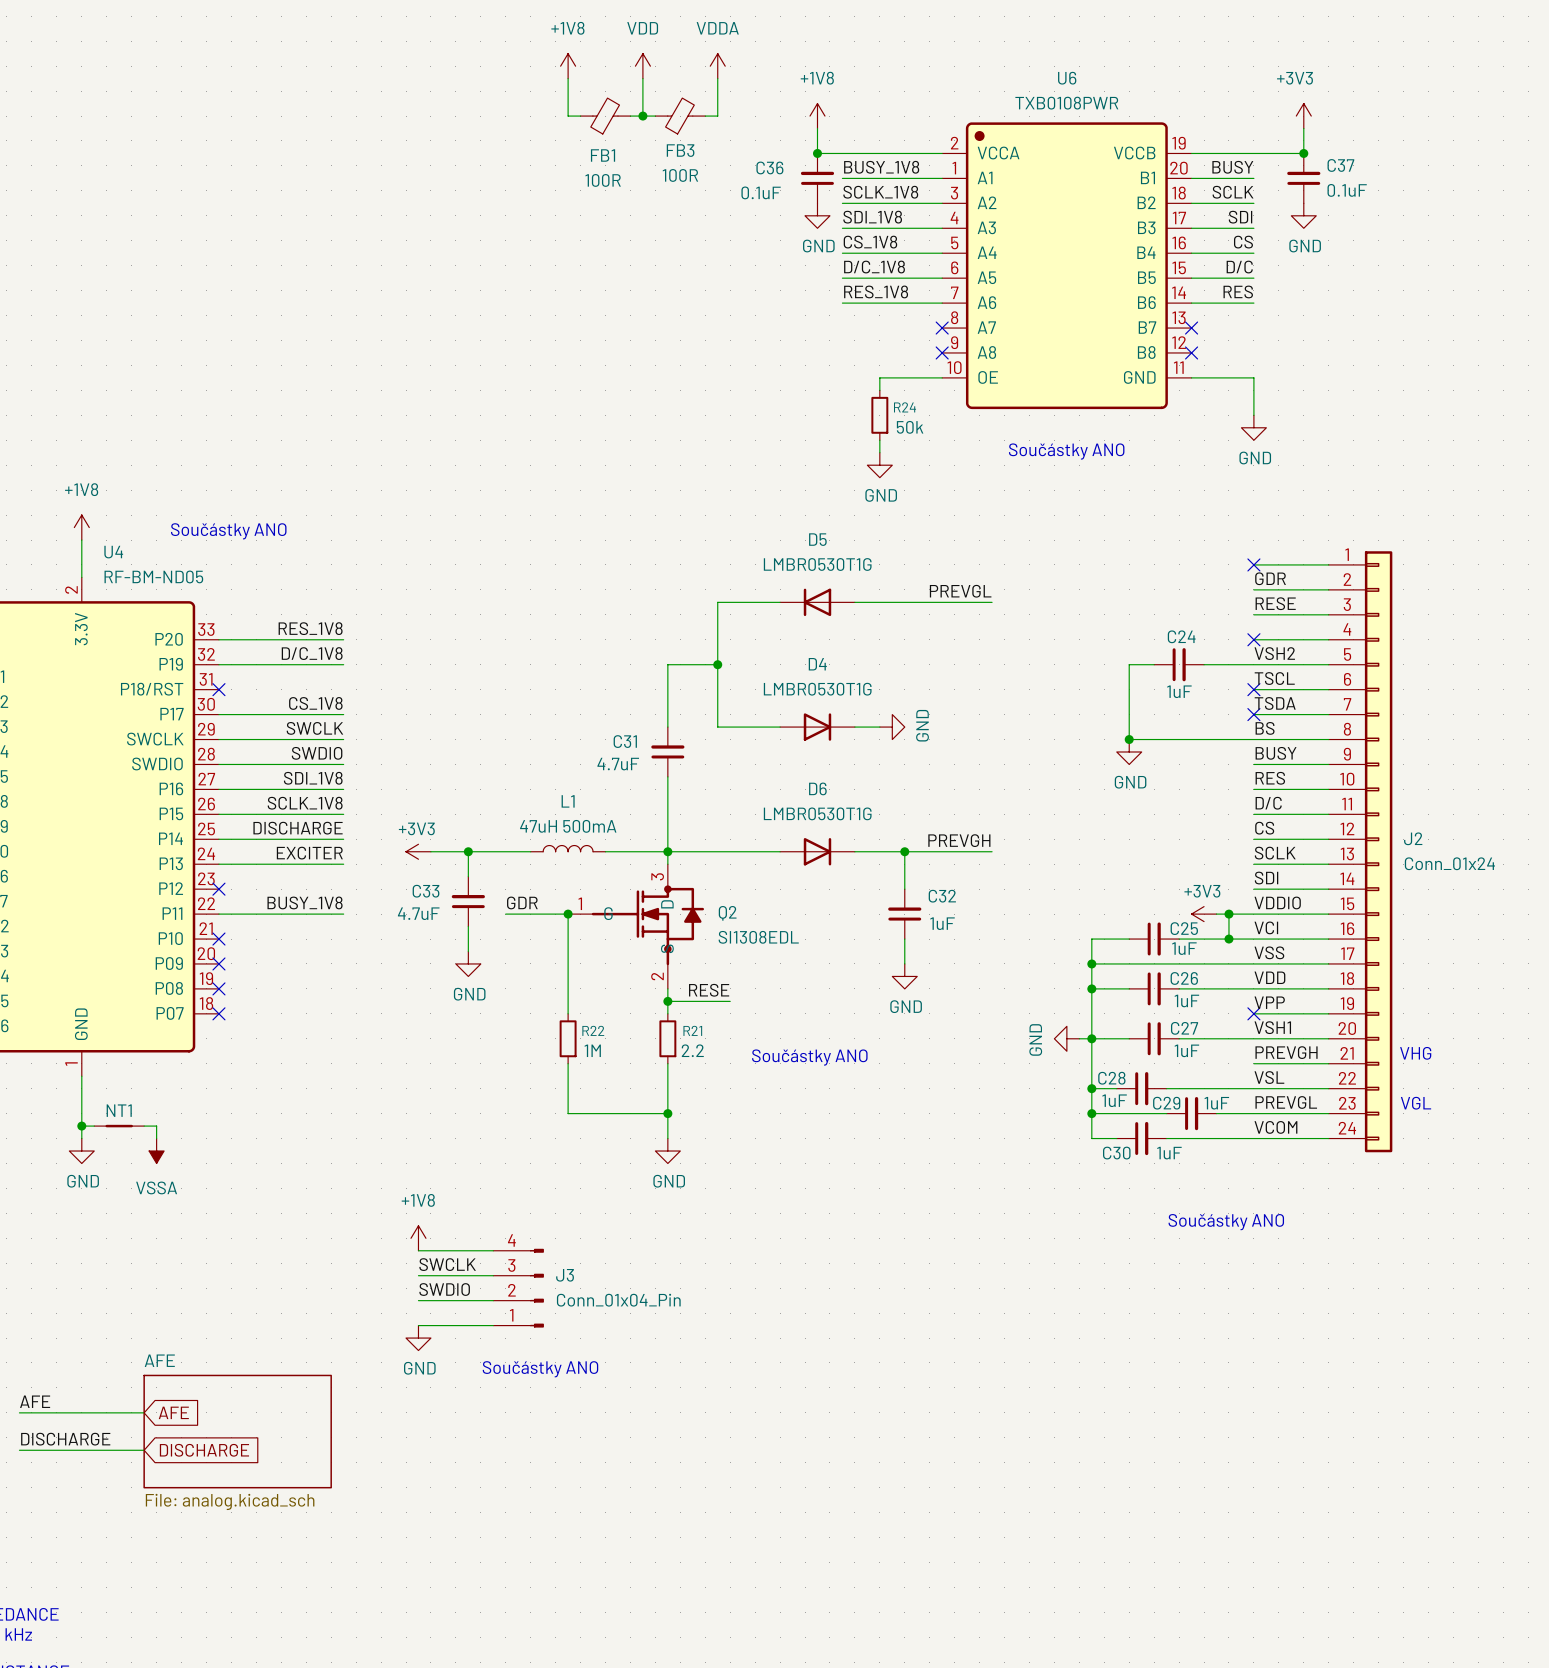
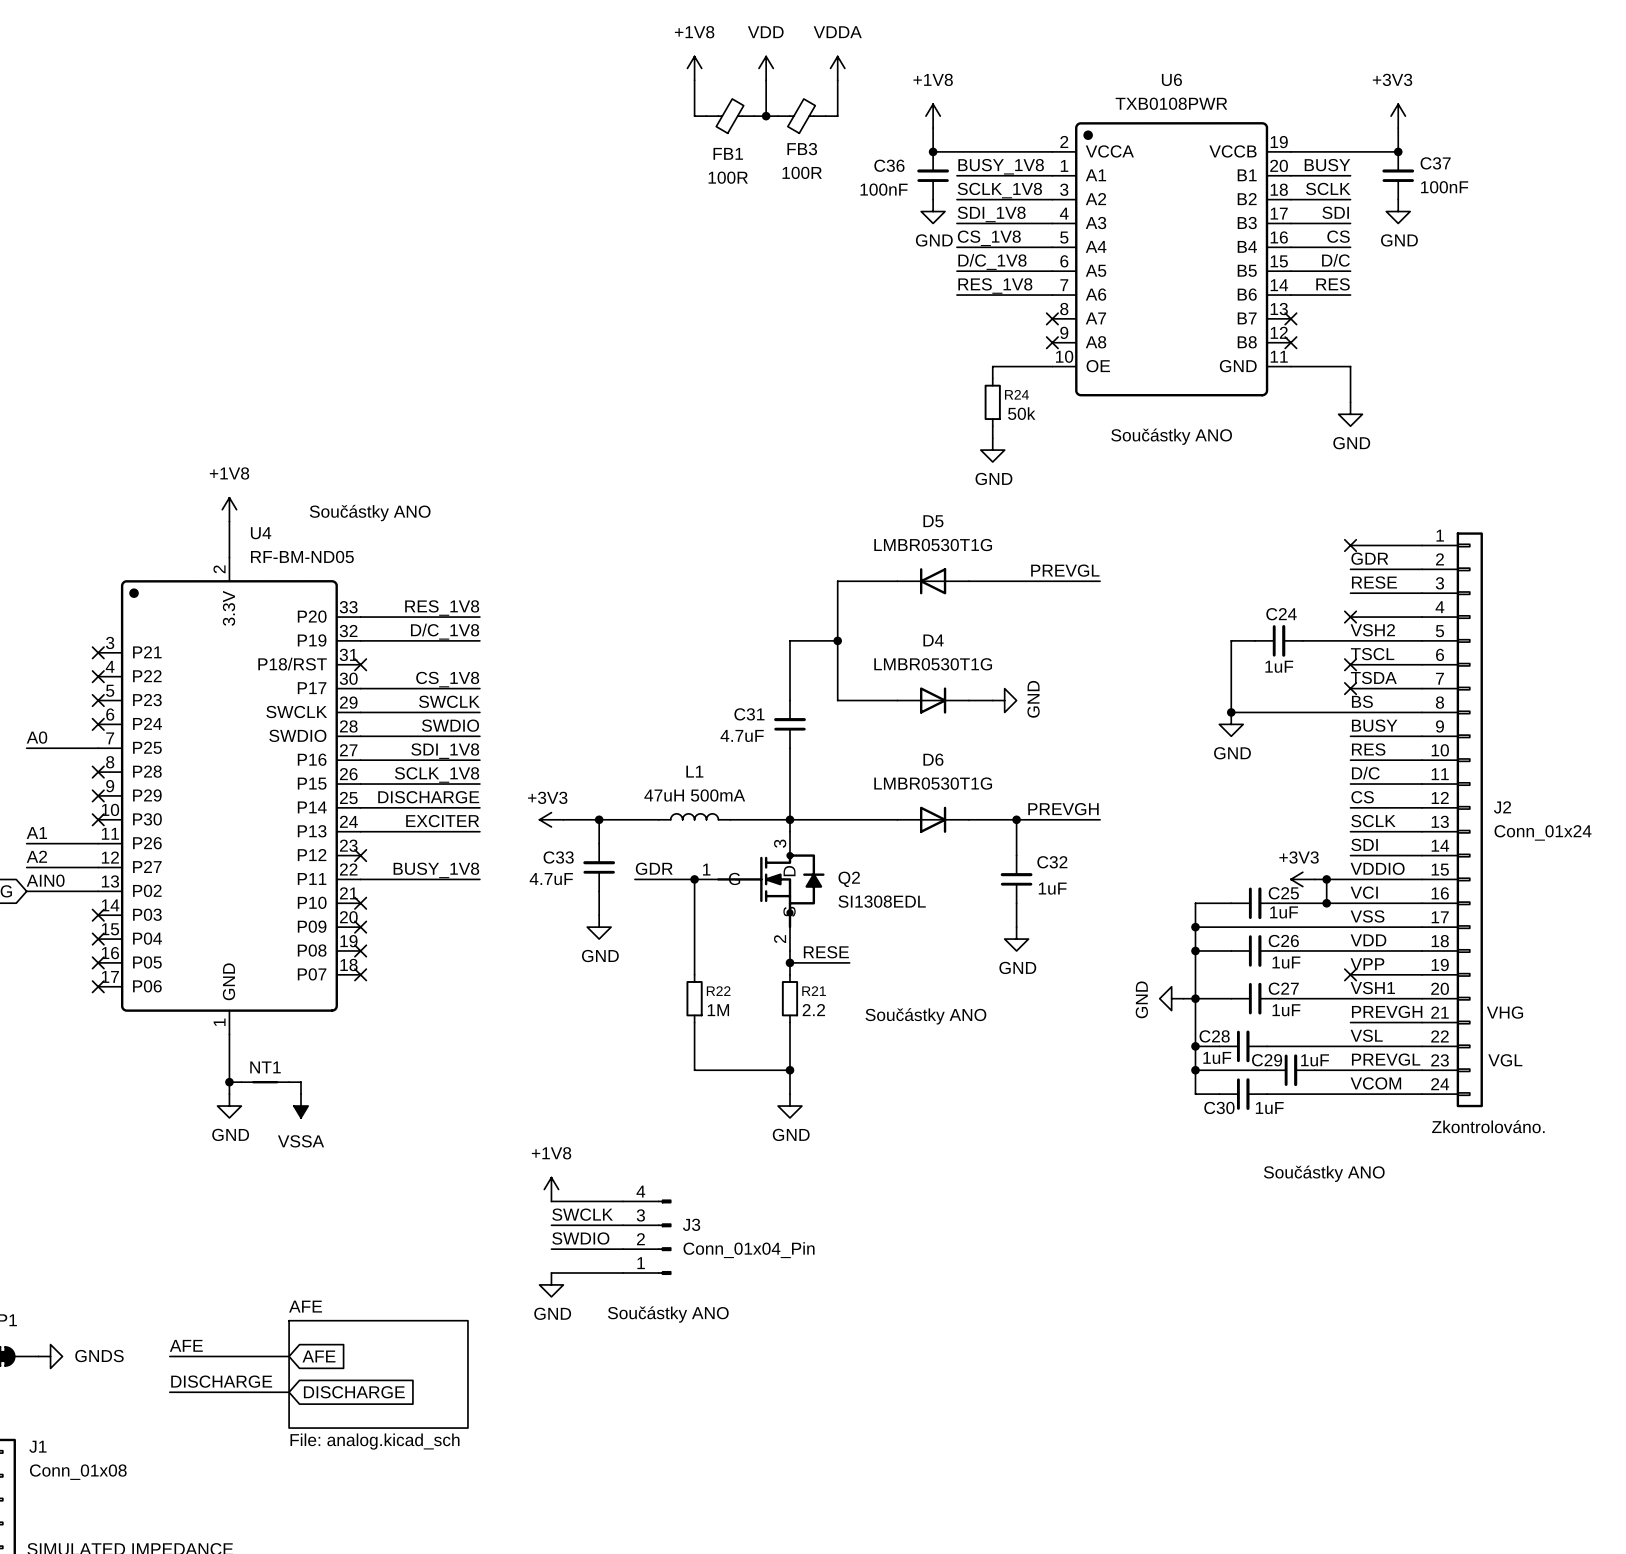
C37 value: 0.1uF (1347, 190) -> 100nF (1444, 187)
C36 value: 0.1uF (761, 192) -> 100nF (884, 189)
text: none -> Zkontrolováno. (1488, 1126)

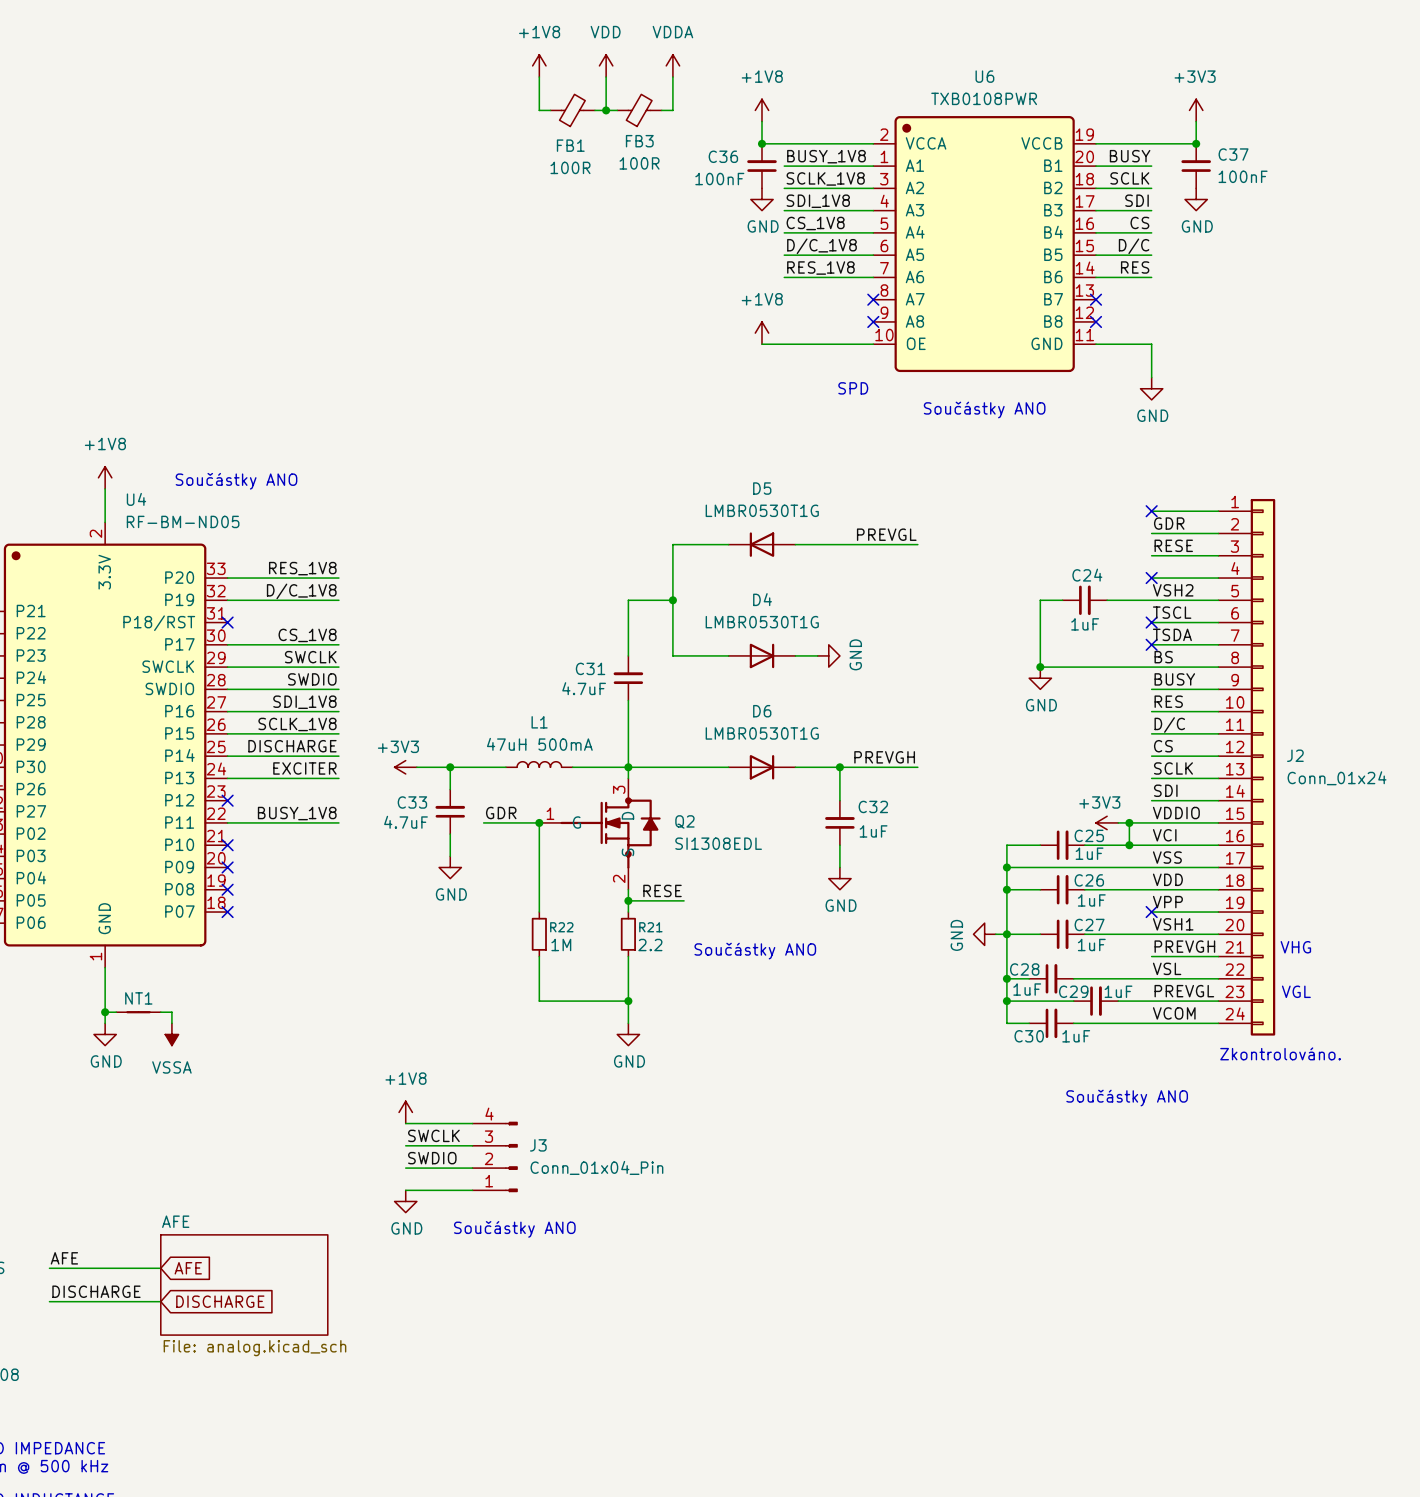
power symbol: none -> +1V8 (761, 333)
wire: (992, 366) (992, 378) -> (817, 344) (761, 344)
R24: 50k (992, 402) -> none
text: none -> SPD (853, 388)
wire: (992, 426) (992, 438) -> none
power symbol: GND (992, 450) -> none

